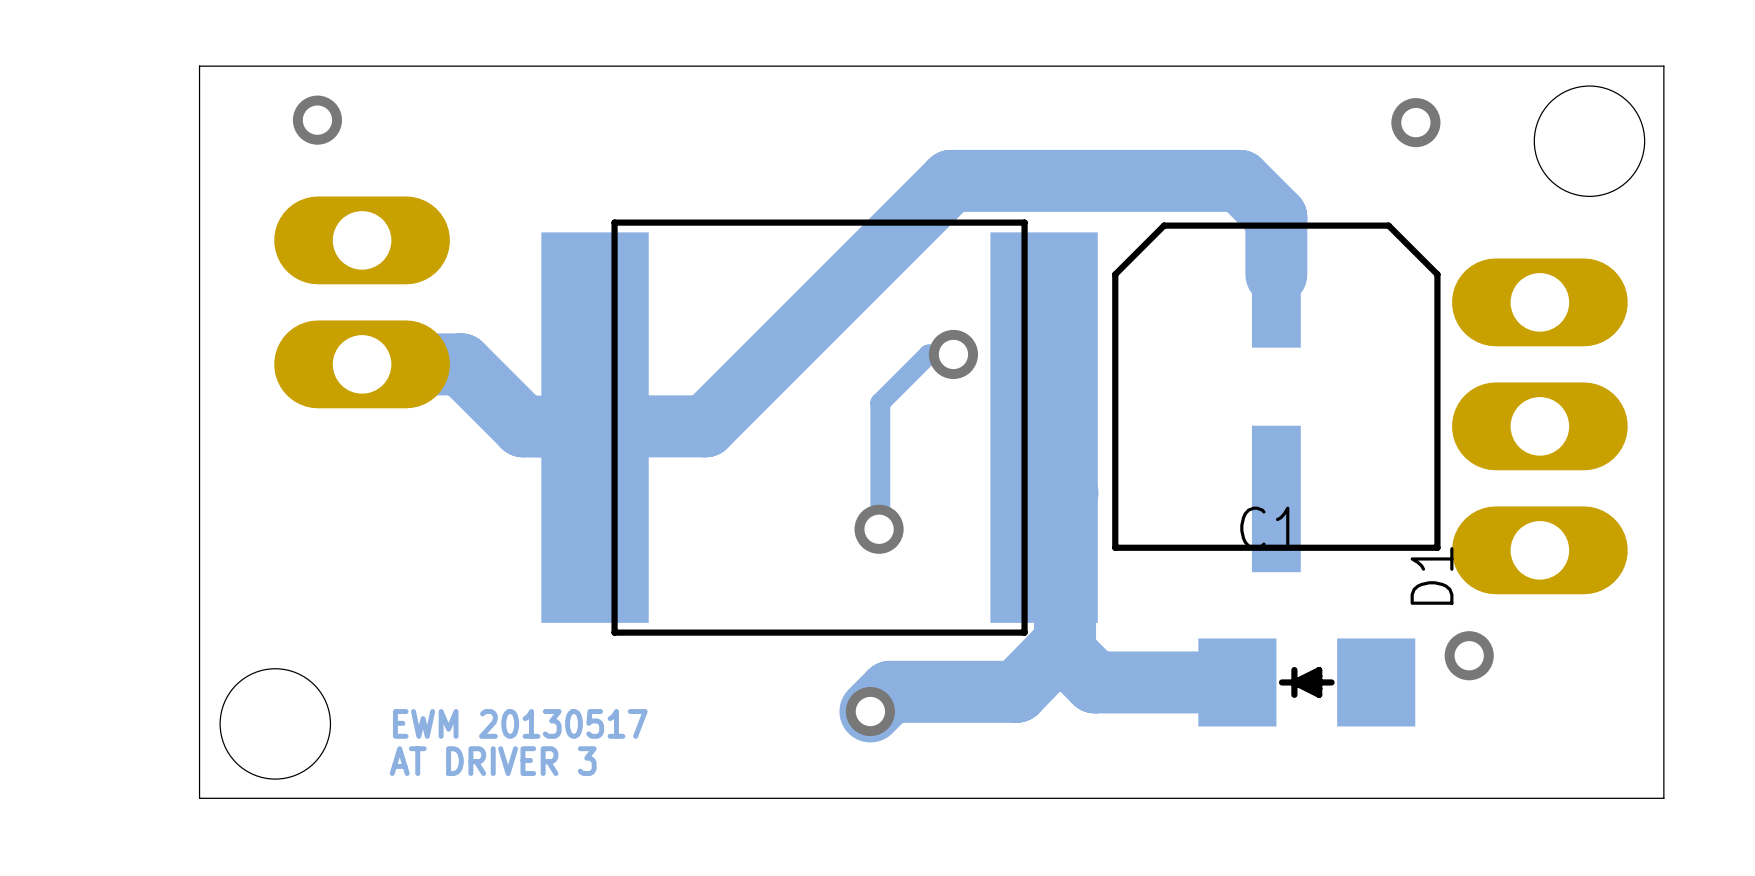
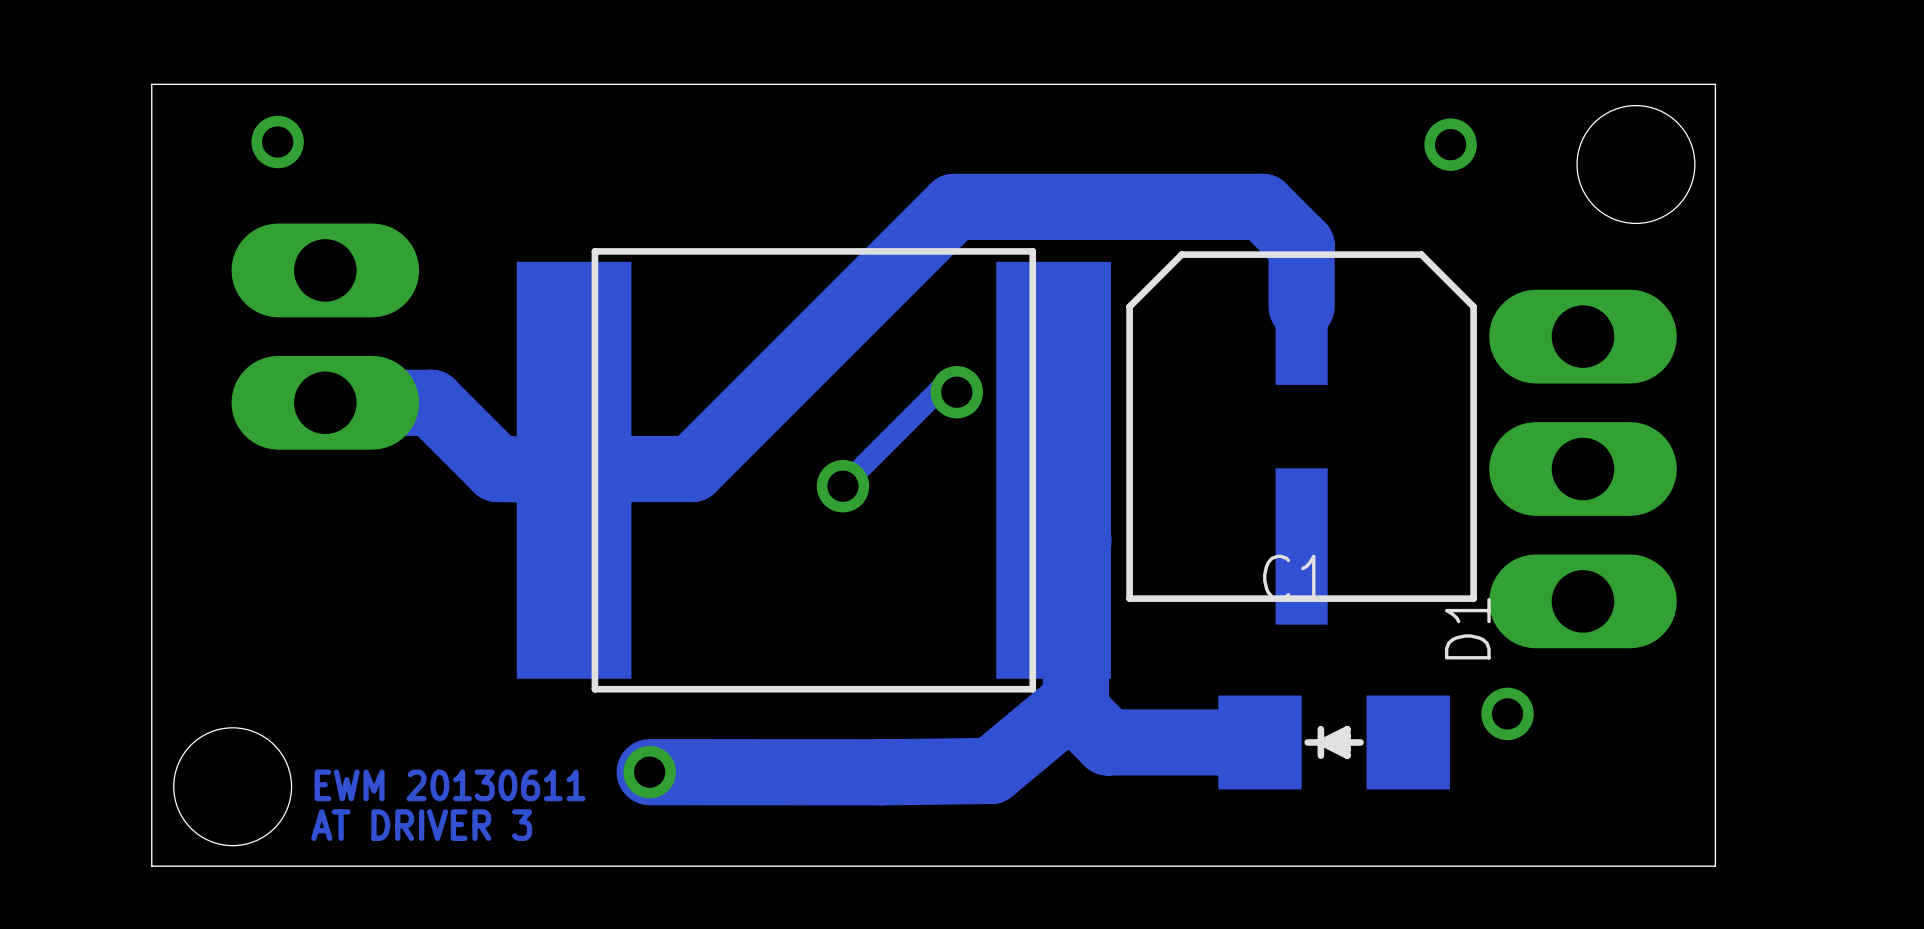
track: (953, 354) (928, 354) (880, 402) (879, 529) -> (958, 390) (938, 390) (842, 486)
via position: (879, 529) -> (842, 486)
track: (1059, 647) (1016, 691) (890, 691) (870, 711) -> (1070, 704) (991, 770) (649, 772)
via: none -> (649, 772)
via: (870, 711) -> none
text: EWM 20130517 (520, 723) -> EWM 20130611 (450, 785)
text position: AT DRIVER 3 (493, 761) -> AT DRIVER 3 (421, 825)

